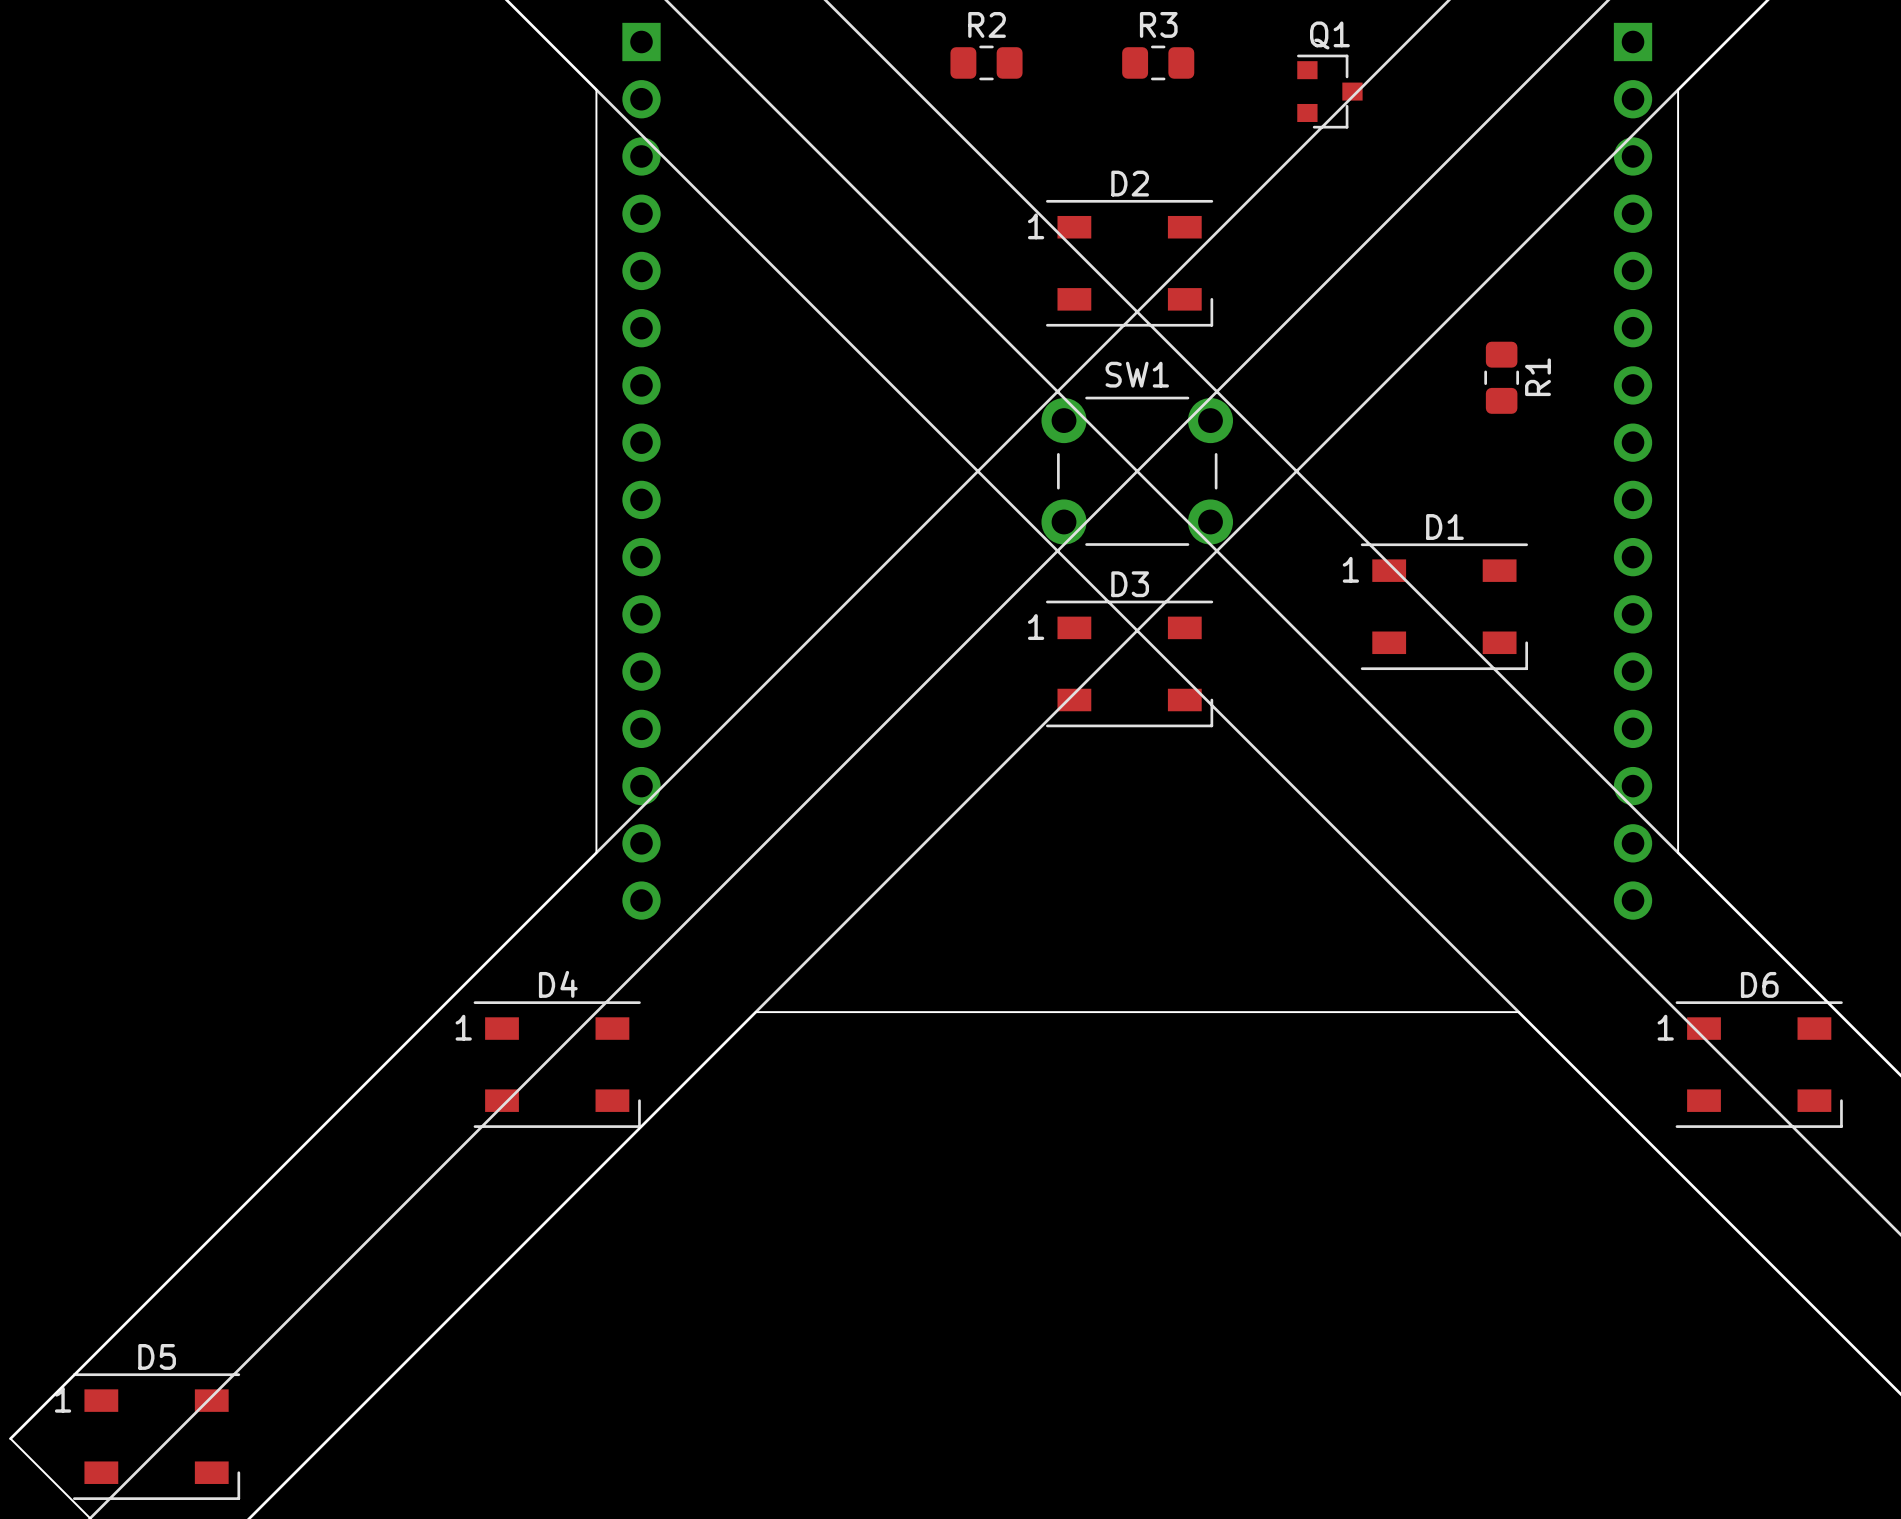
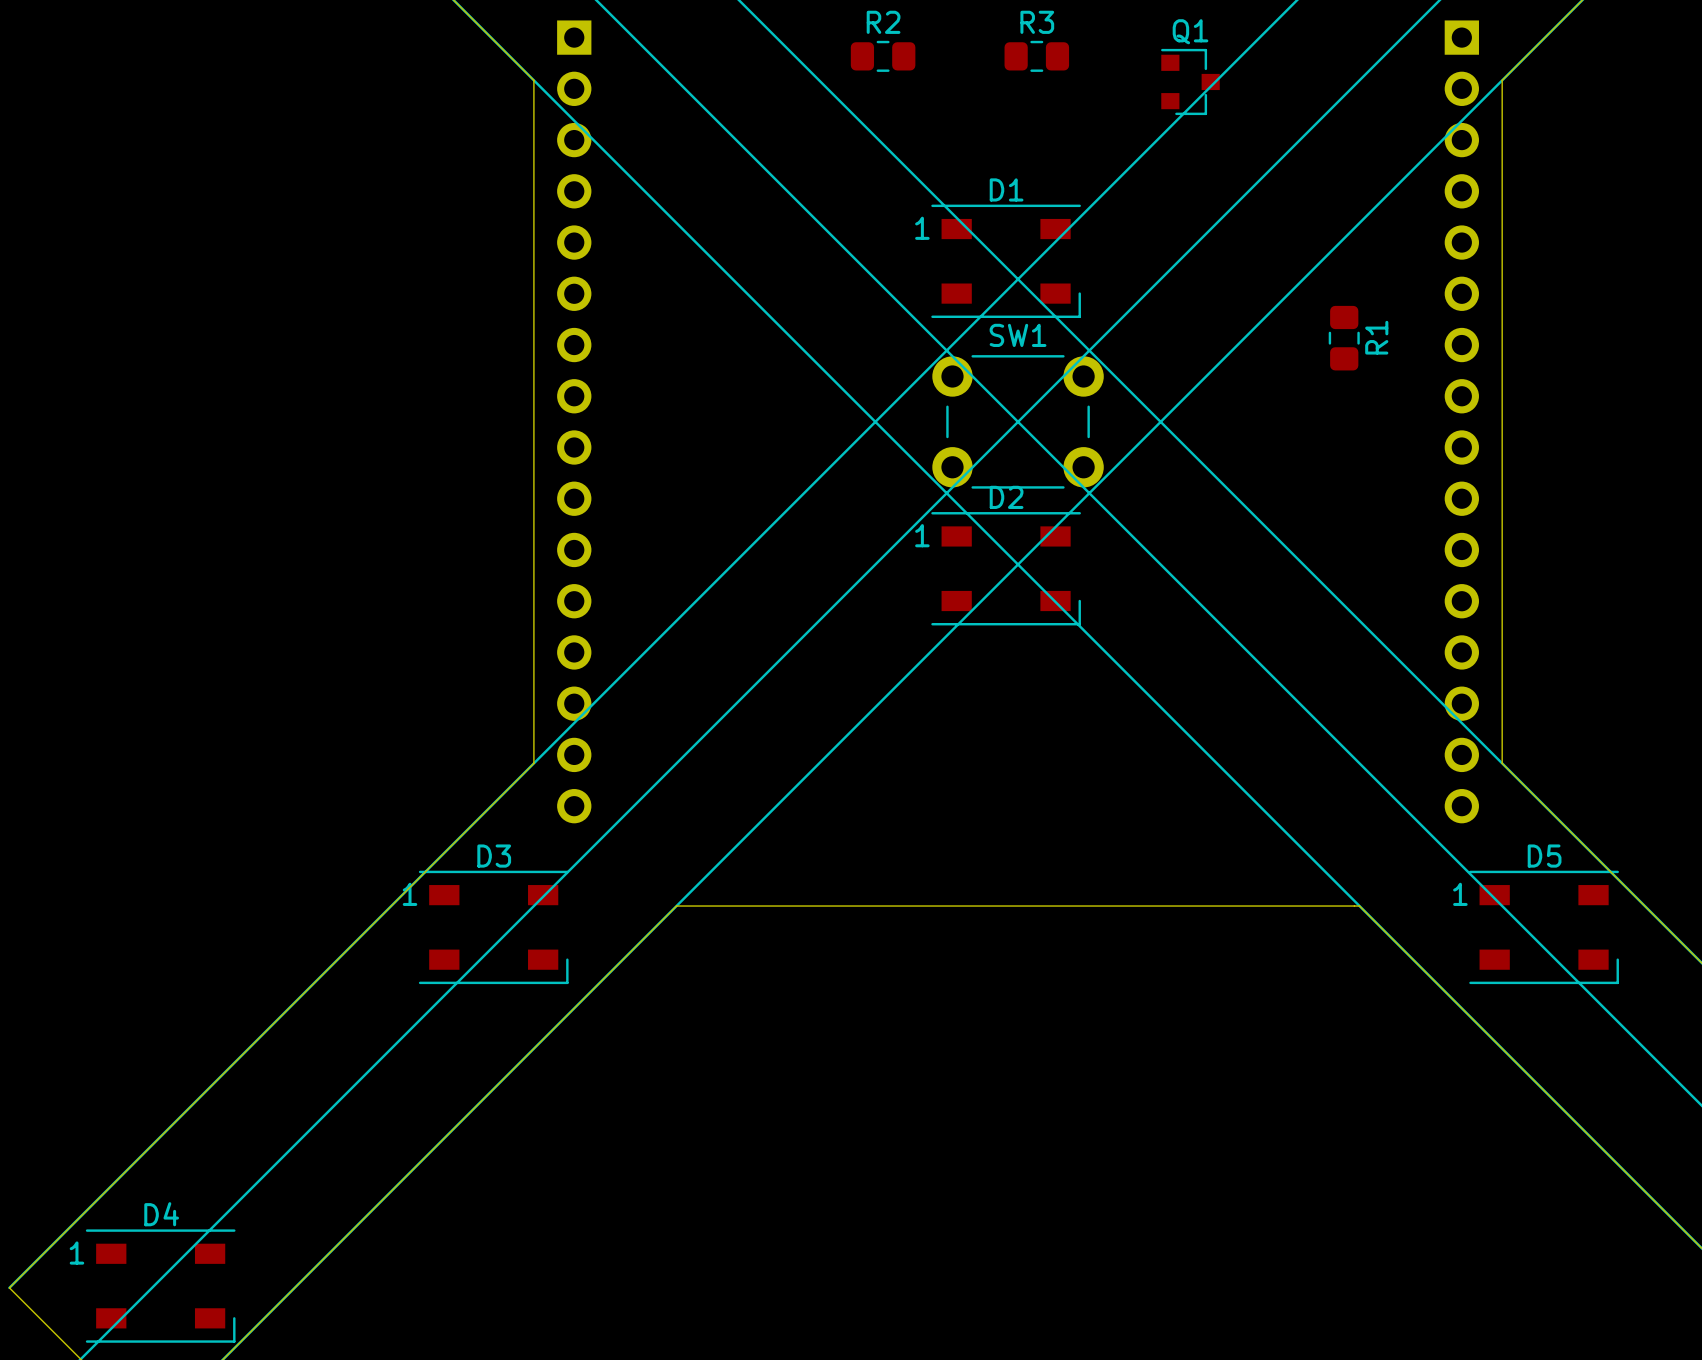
D2 position: (1129, 263) -> (1006, 568)
D1 position: (1444, 606) -> (1006, 261)
D3 position: (1129, 663) -> (493, 927)
D4 position: (557, 1064) -> (160, 1286)
D6: (1759, 1064) -> none
D5 position: (156, 1436) -> (1544, 927)

